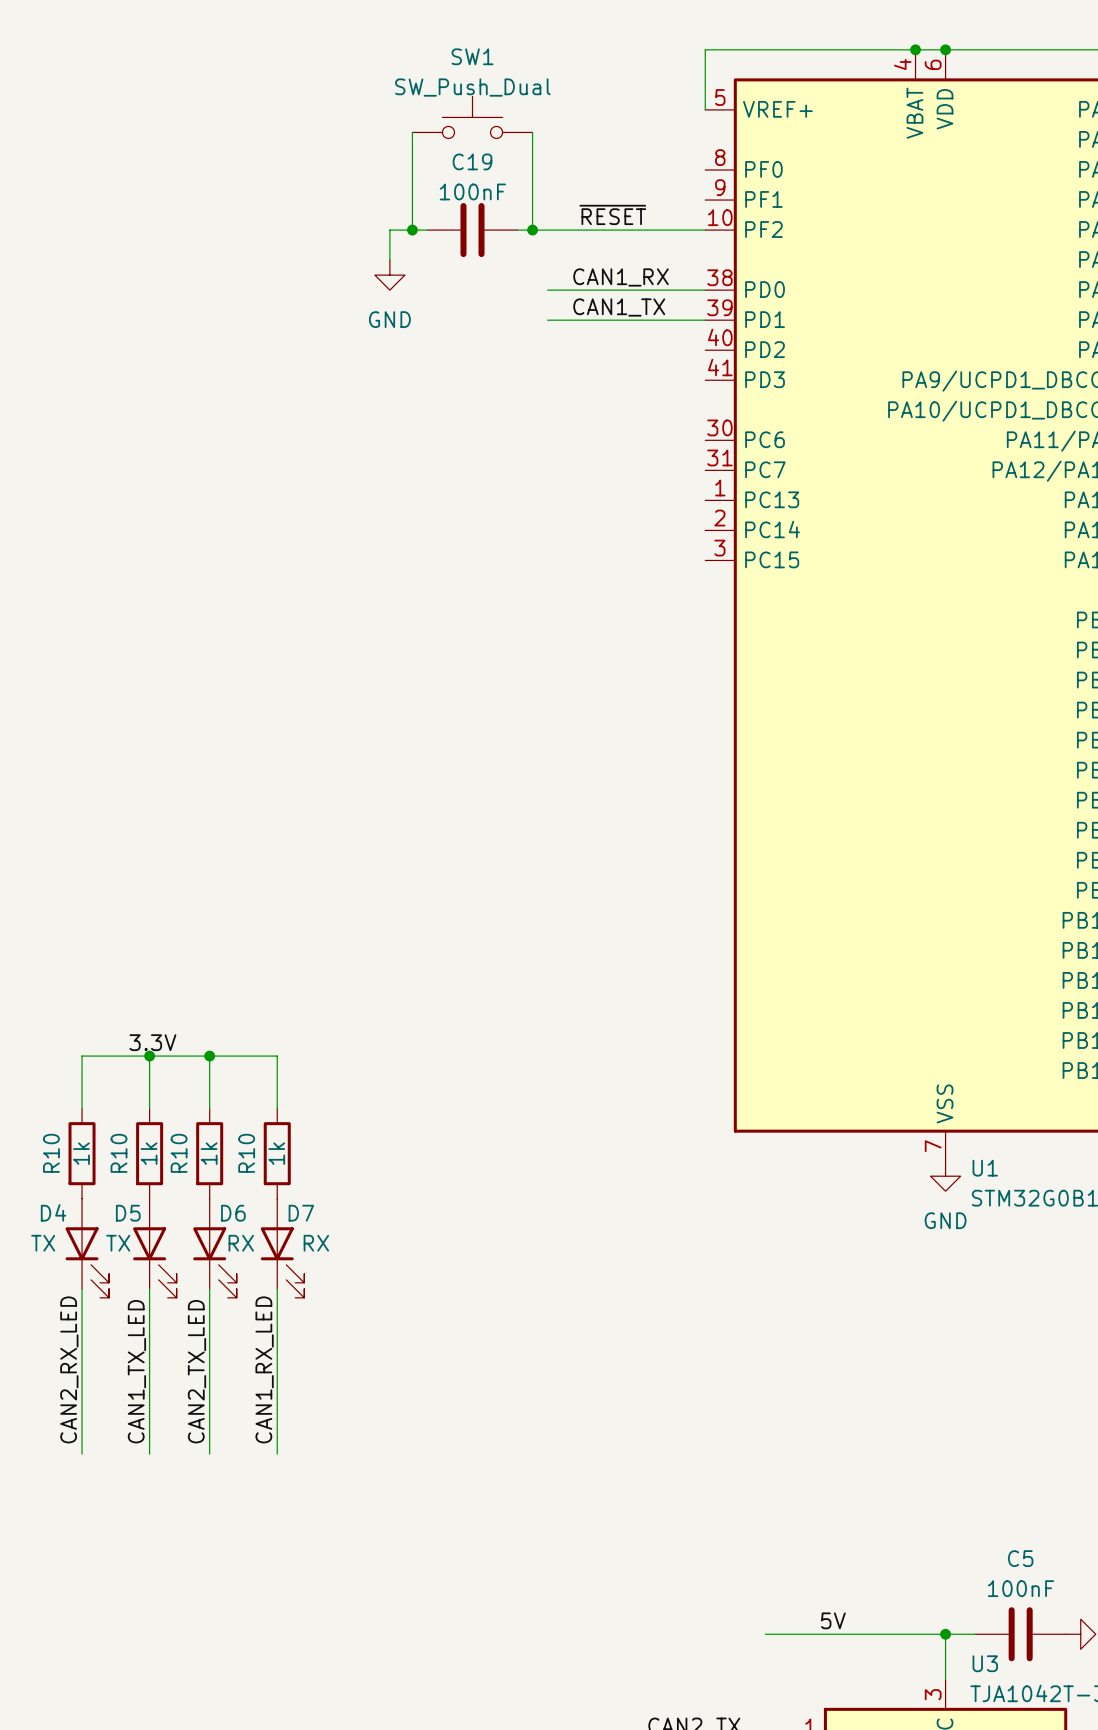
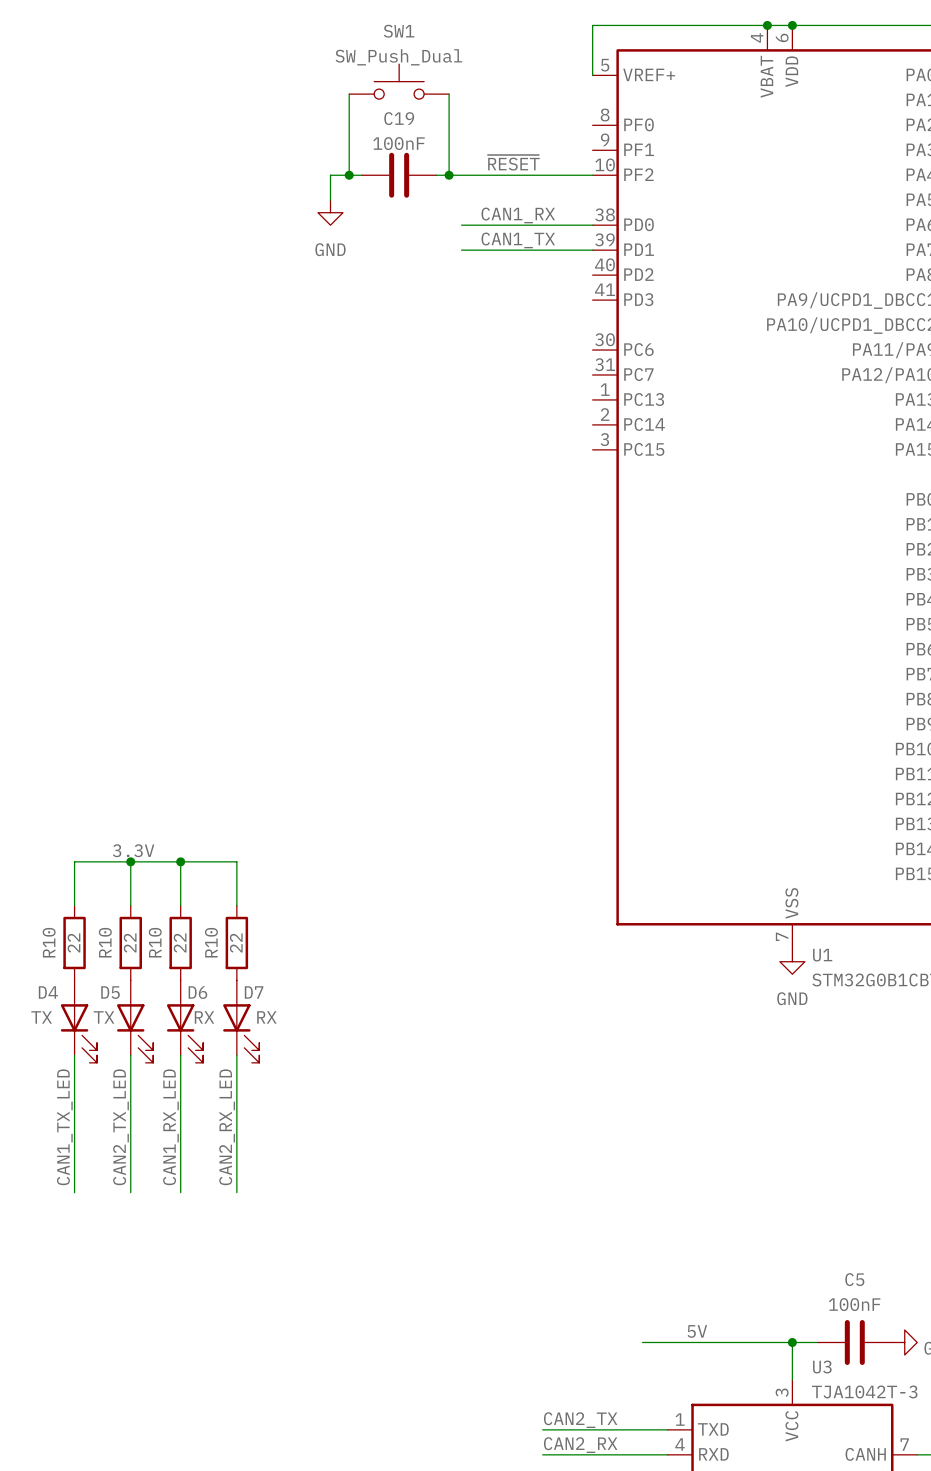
R10 value: 1k (81, 1153) -> 22 (73, 942)
R10 value: 1k (149, 1153) -> 22 (130, 942)
R10 value: 1k (209, 1153) -> 22 (180, 942)
R10 value: 1k (276, 1153) -> 22 (236, 942)
label: CAN2_RX_LED (69, 1369) -> CAN1_TX_LED (64, 1127)
label: CAN1_RX_LED (264, 1369) -> CAN2_RX_LED (227, 1127)
label: CAN1_TX_LED (136, 1371) -> CAN2_TX_LED (121, 1127)
label: CAN2_TX_LED (196, 1371) -> CAN1_RX_LED (170, 1127)

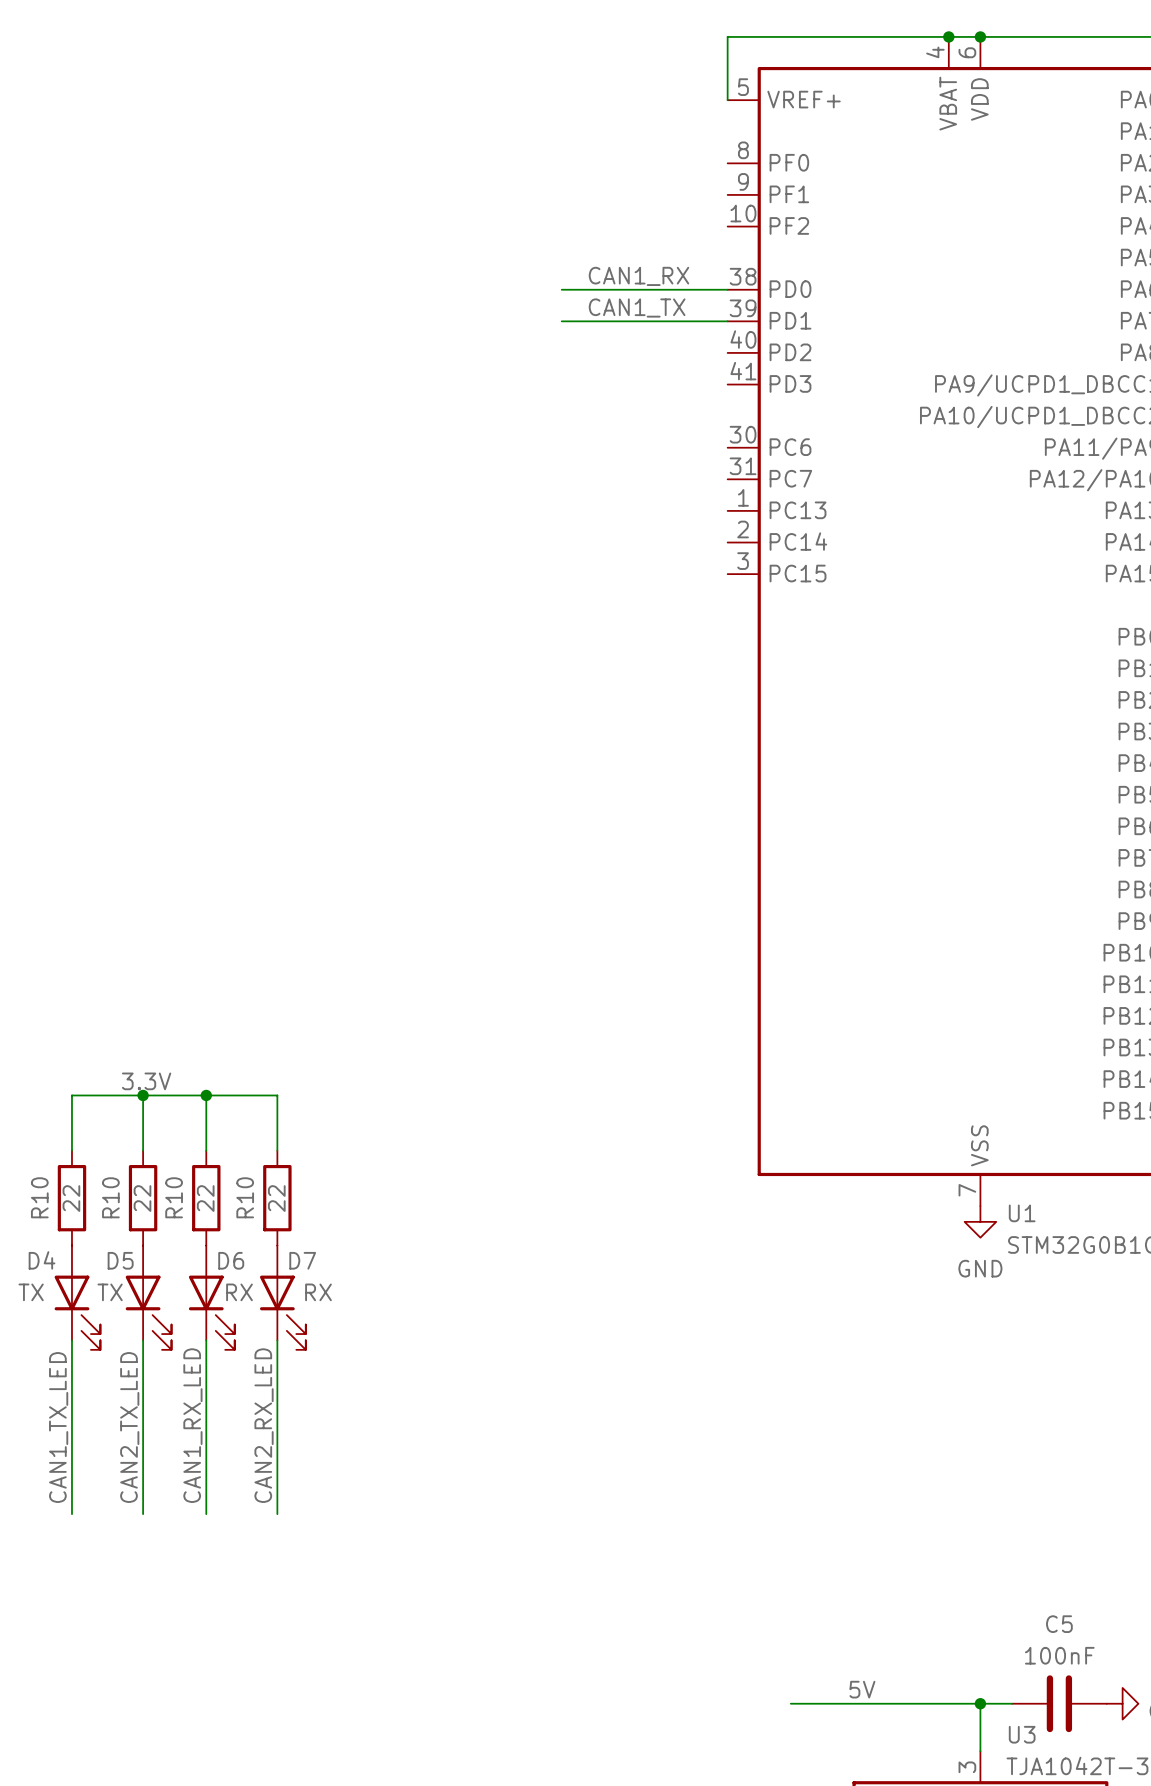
SW1: SW_Push_Dual (399, 81) -> none
wire: (349, 94) (349, 175) -> none
wire: (449, 94) (449, 175) -> none
label: ~{RESET} (513, 162) -> none
junction: (349, 175) -> none
wire: (361, 175) (330, 175) (330, 200) -> none
C19: 100nF (399, 175) -> none
wire: (436, 175) (592, 175) -> none
junction: (449, 175) -> none
power symbol: GND (330, 212) -> none

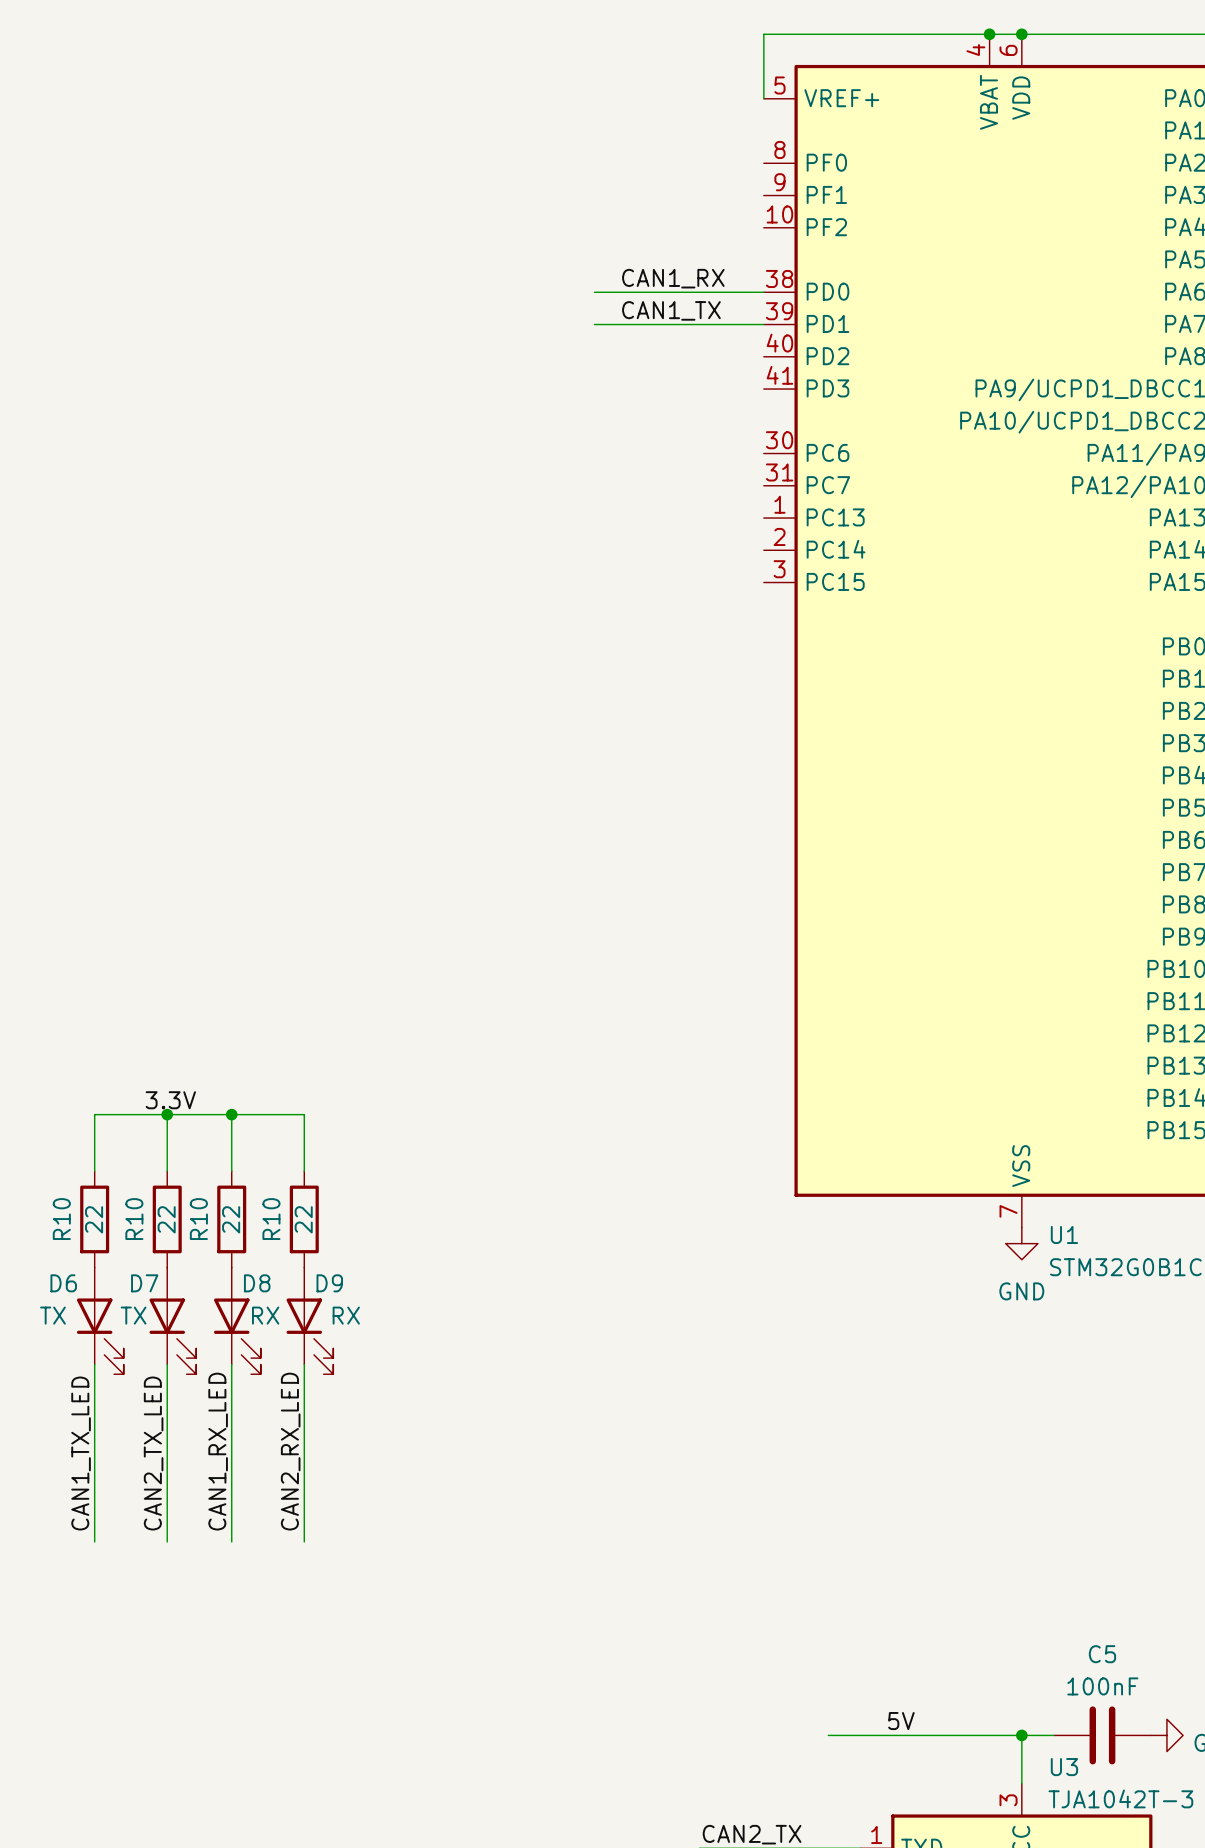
D4 name: D4 (42, 1260) -> D6 (63, 1283)
D5 name: D5 (120, 1260) -> D7 (144, 1283)
D6 name: D6 (231, 1260) -> D8 (257, 1283)
D7 name: D7 (302, 1260) -> D9 (329, 1283)

